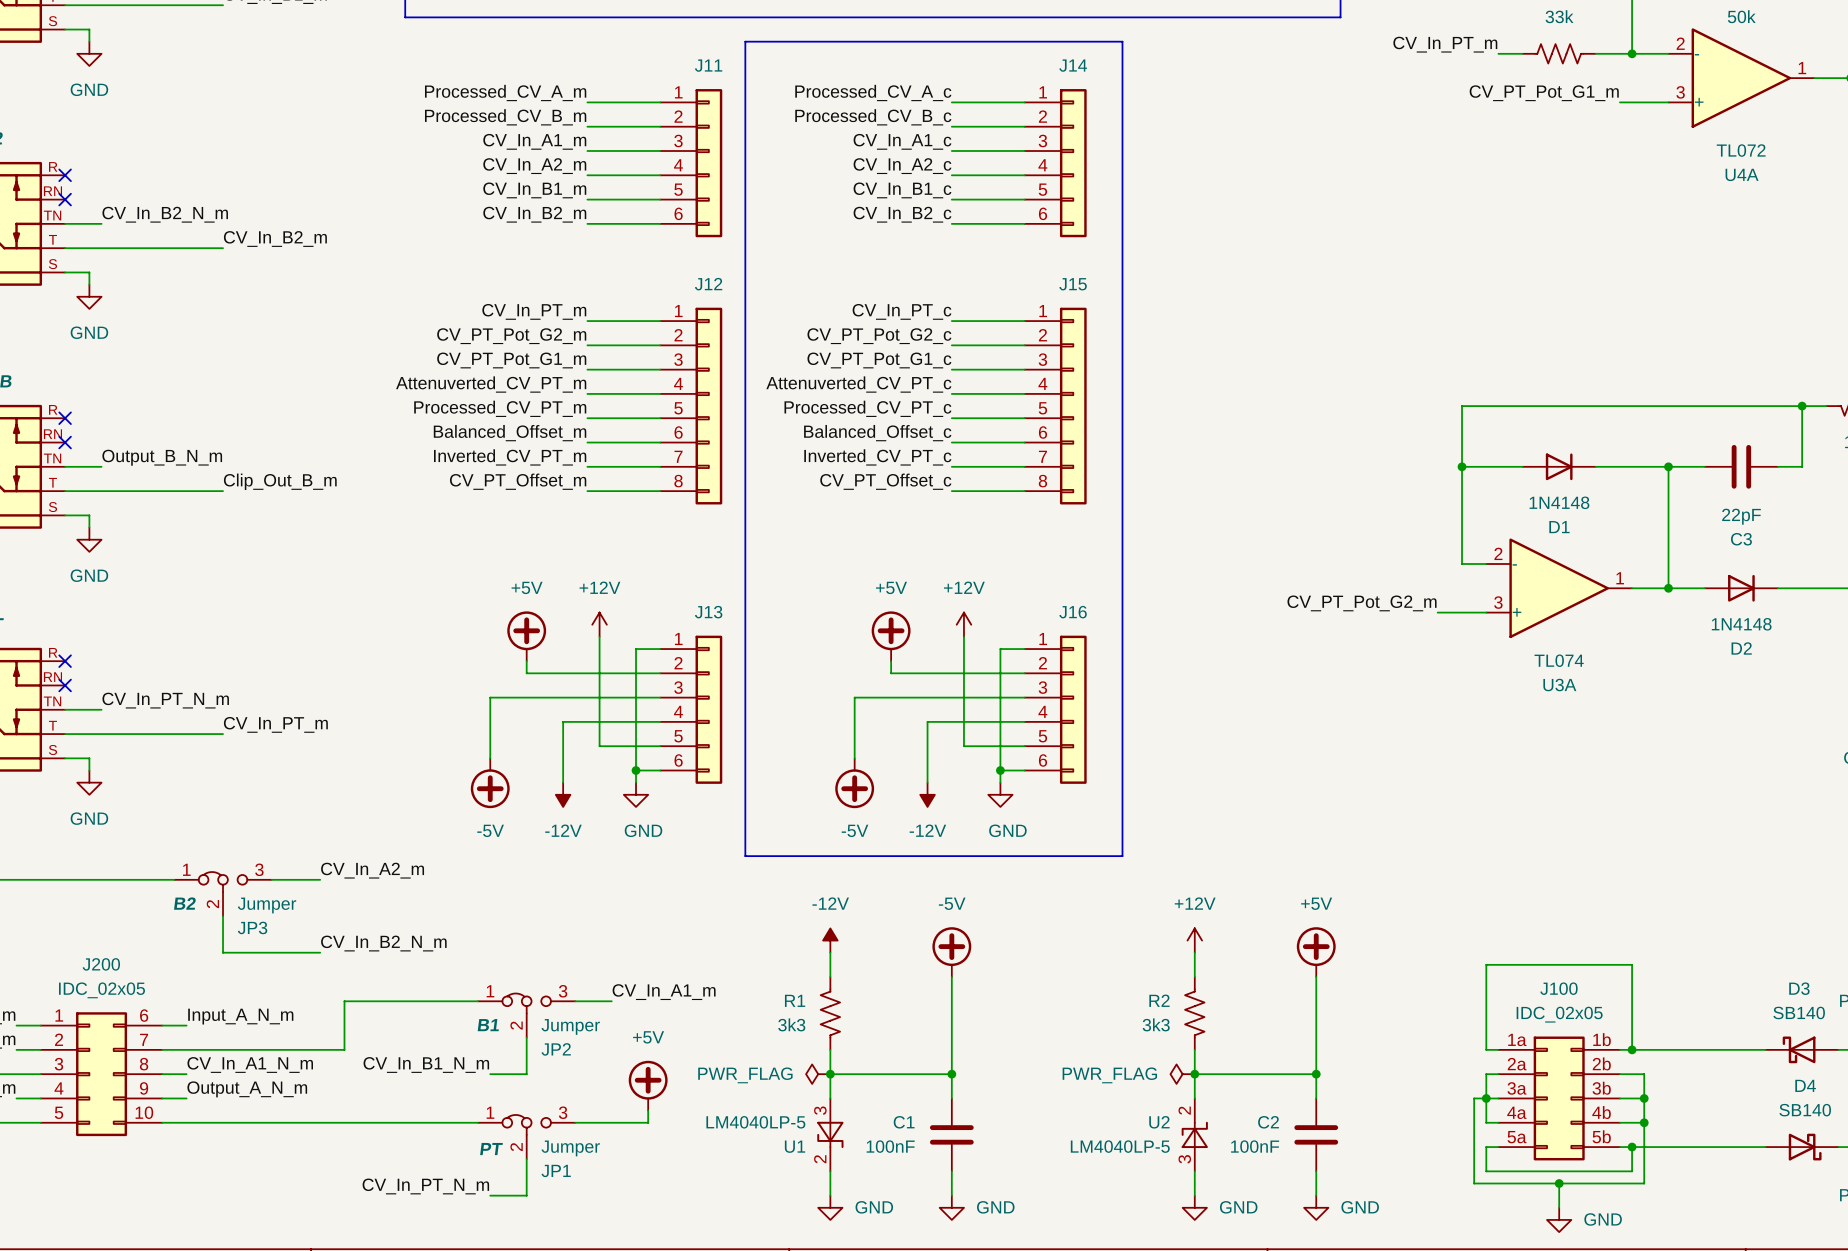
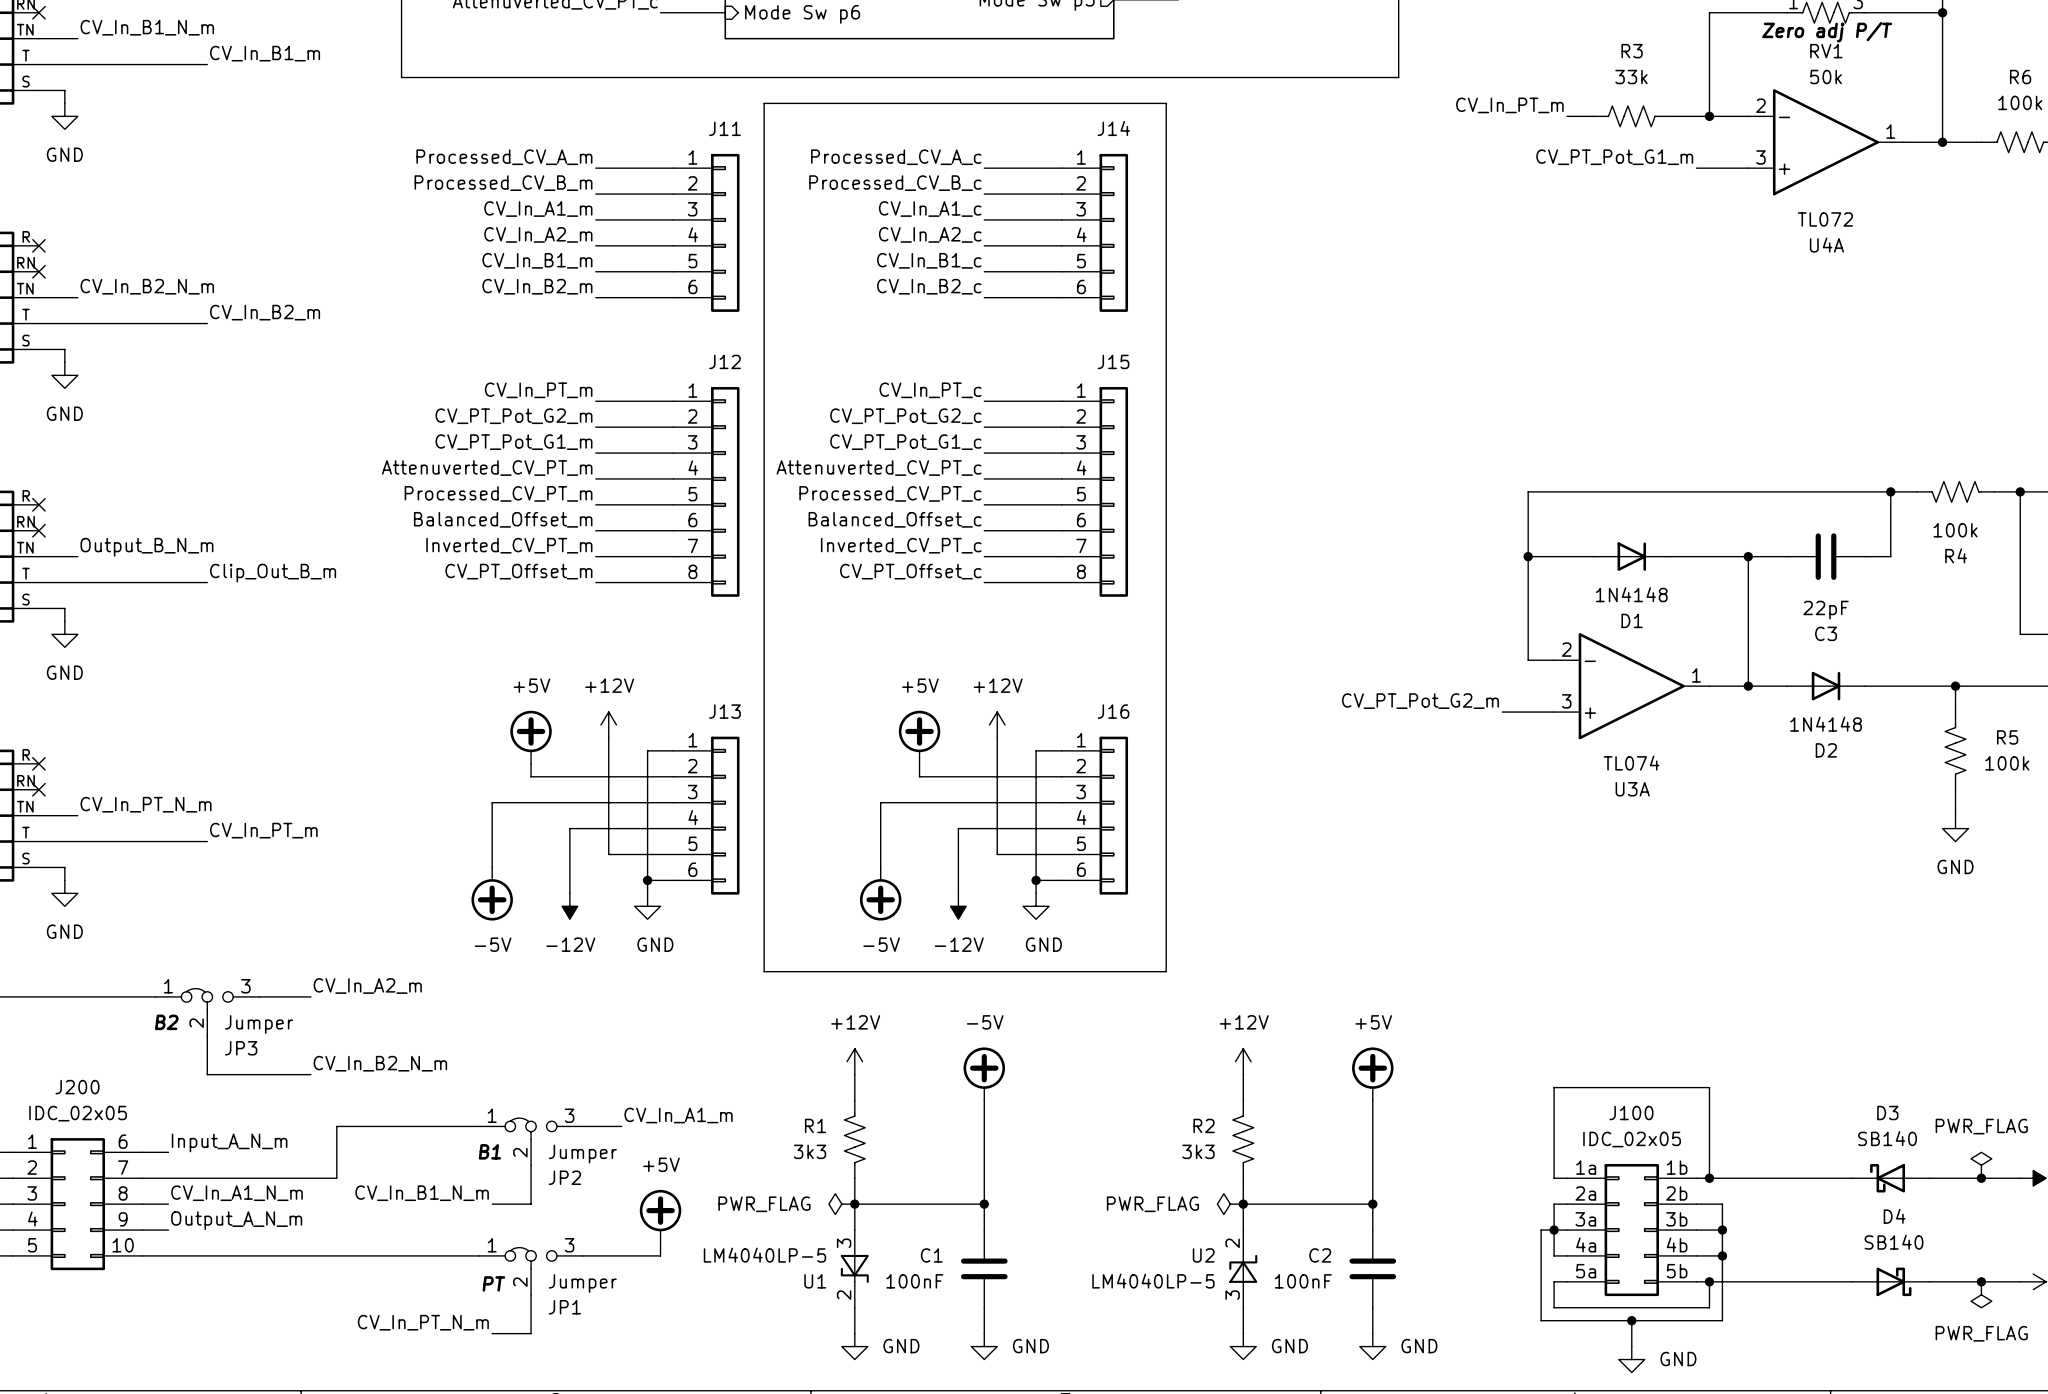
power symbol: -12V (830, 940) -> +12V (854, 1061)

